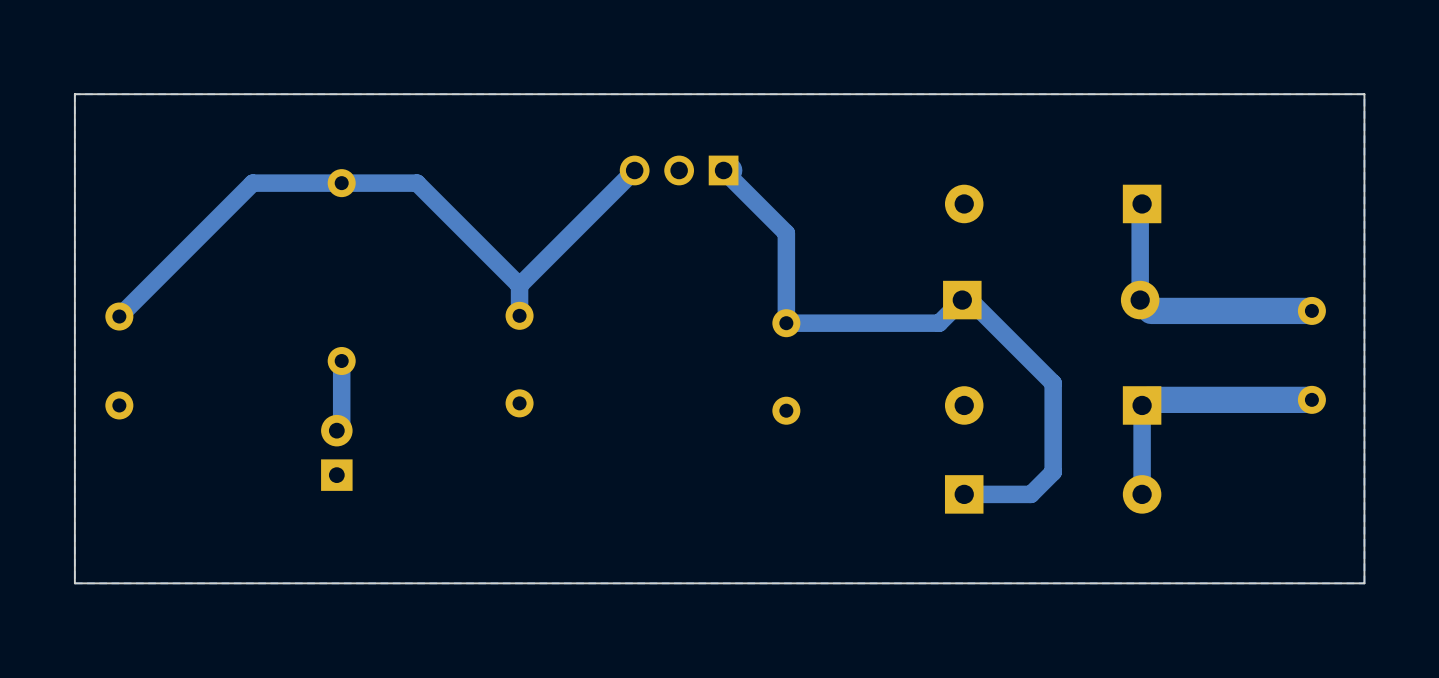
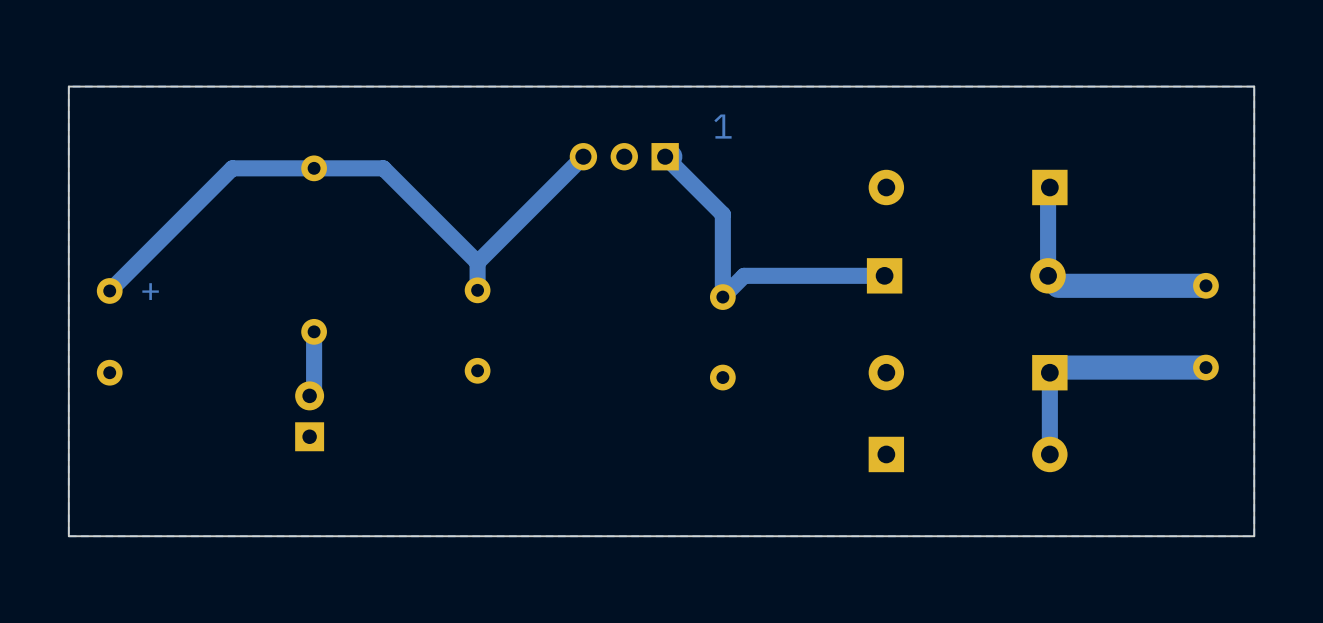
text: none -> 1 (722, 126)
text: none -> + (150, 291)
track: (786, 323) (939, 323) (962, 300) (970, 300) (1053, 383) (1053, 472) (1030, 494) (964, 494) -> (722, 297) (744, 275) (884, 275)

